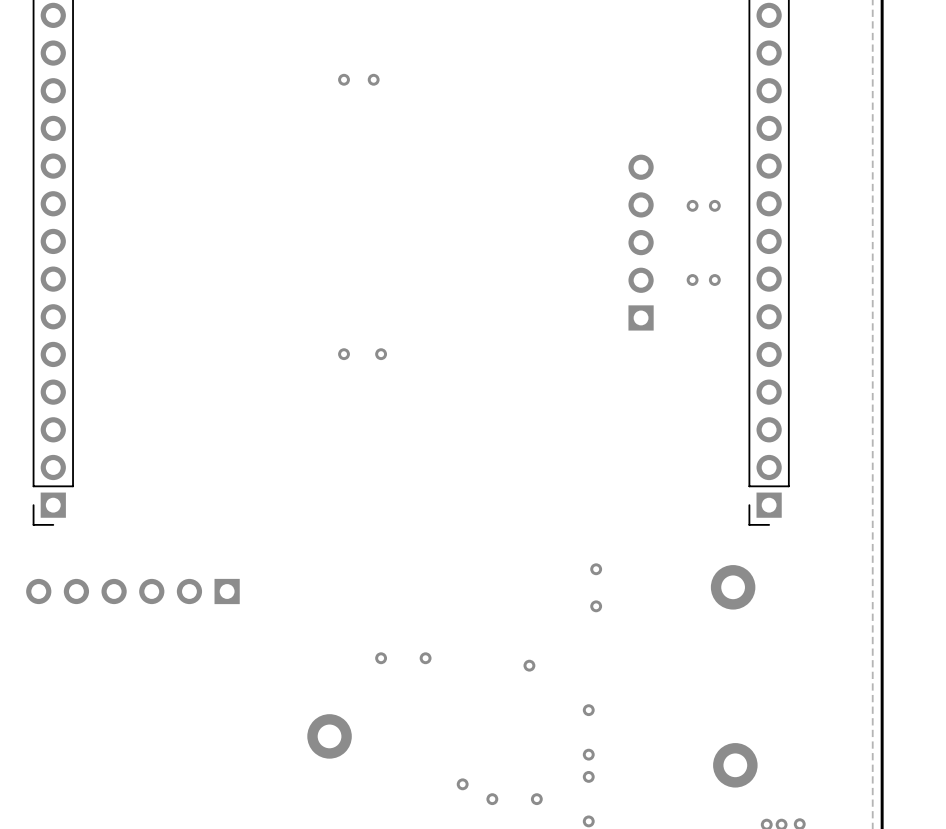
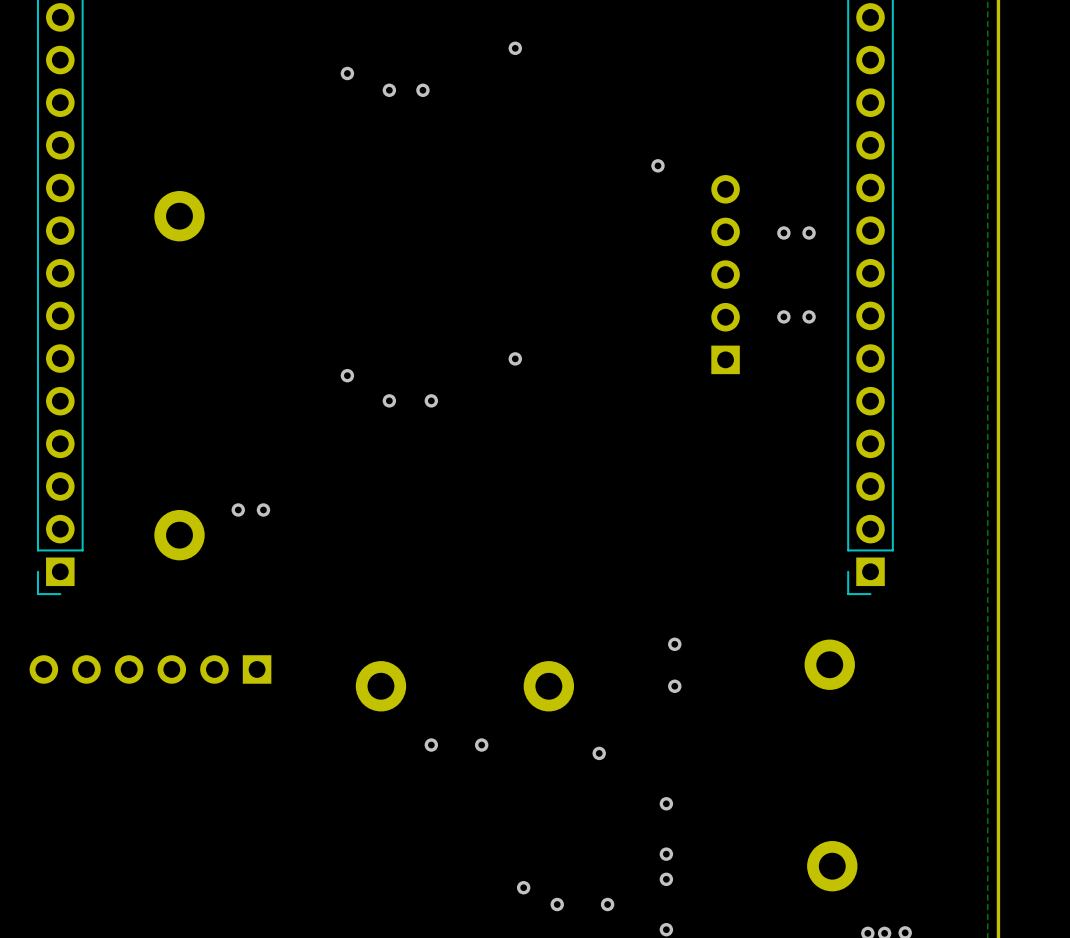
via: none -> (515, 48)
via: none -> (347, 73)
via: none -> (657, 165)
part: none -> (179, 216)
via: none -> (515, 358)
via: none -> (347, 375)
via: none -> (238, 509)
via: none -> (263, 509)
part: none -> (179, 535)
part: none -> (380, 686)
part: none -> (548, 686)
part: (329, 736) -> none

